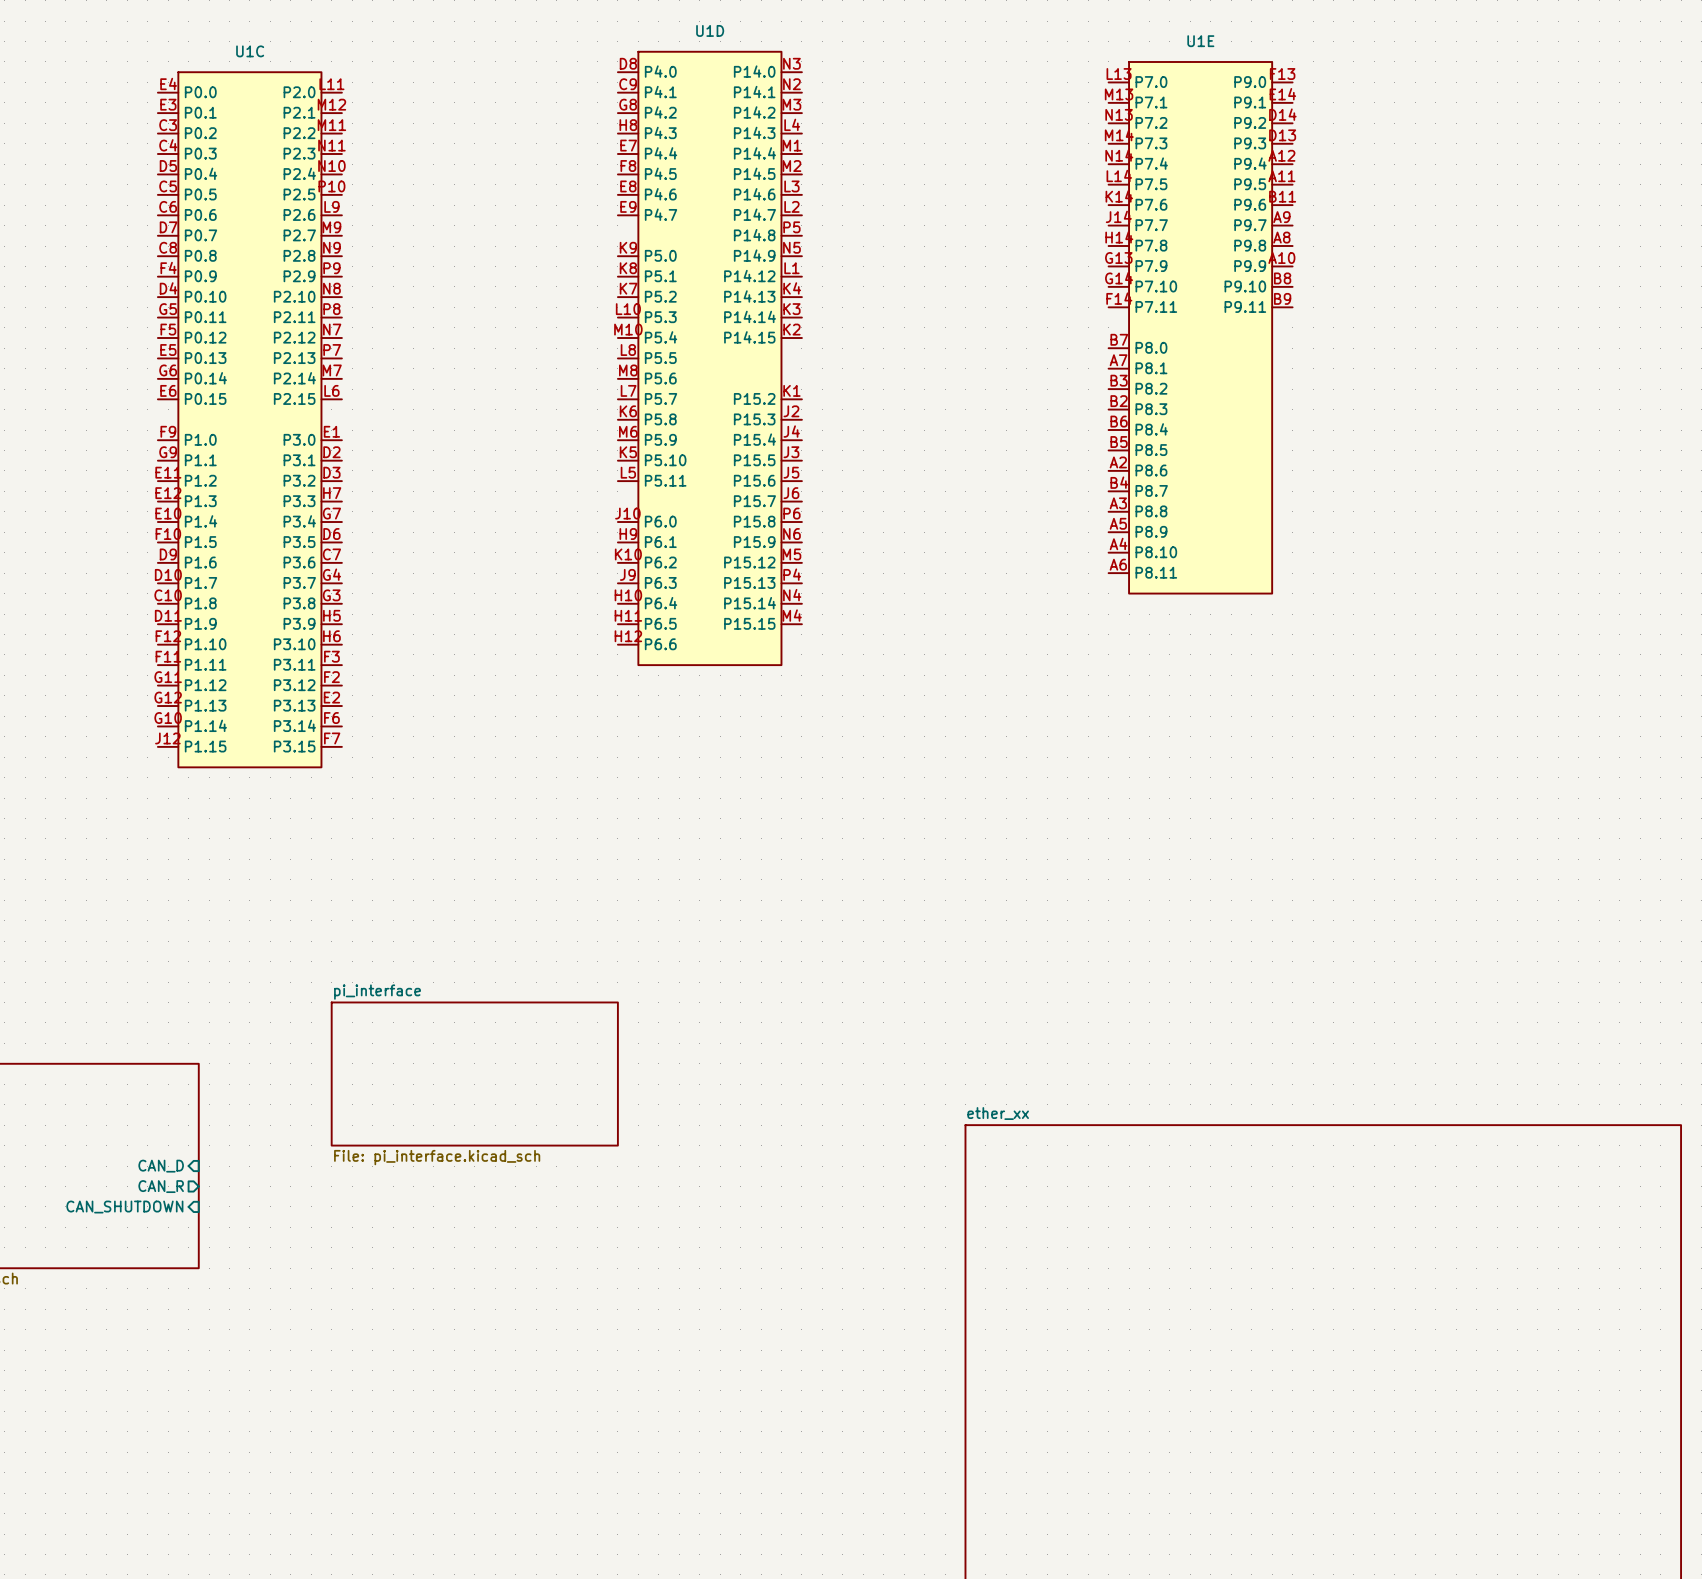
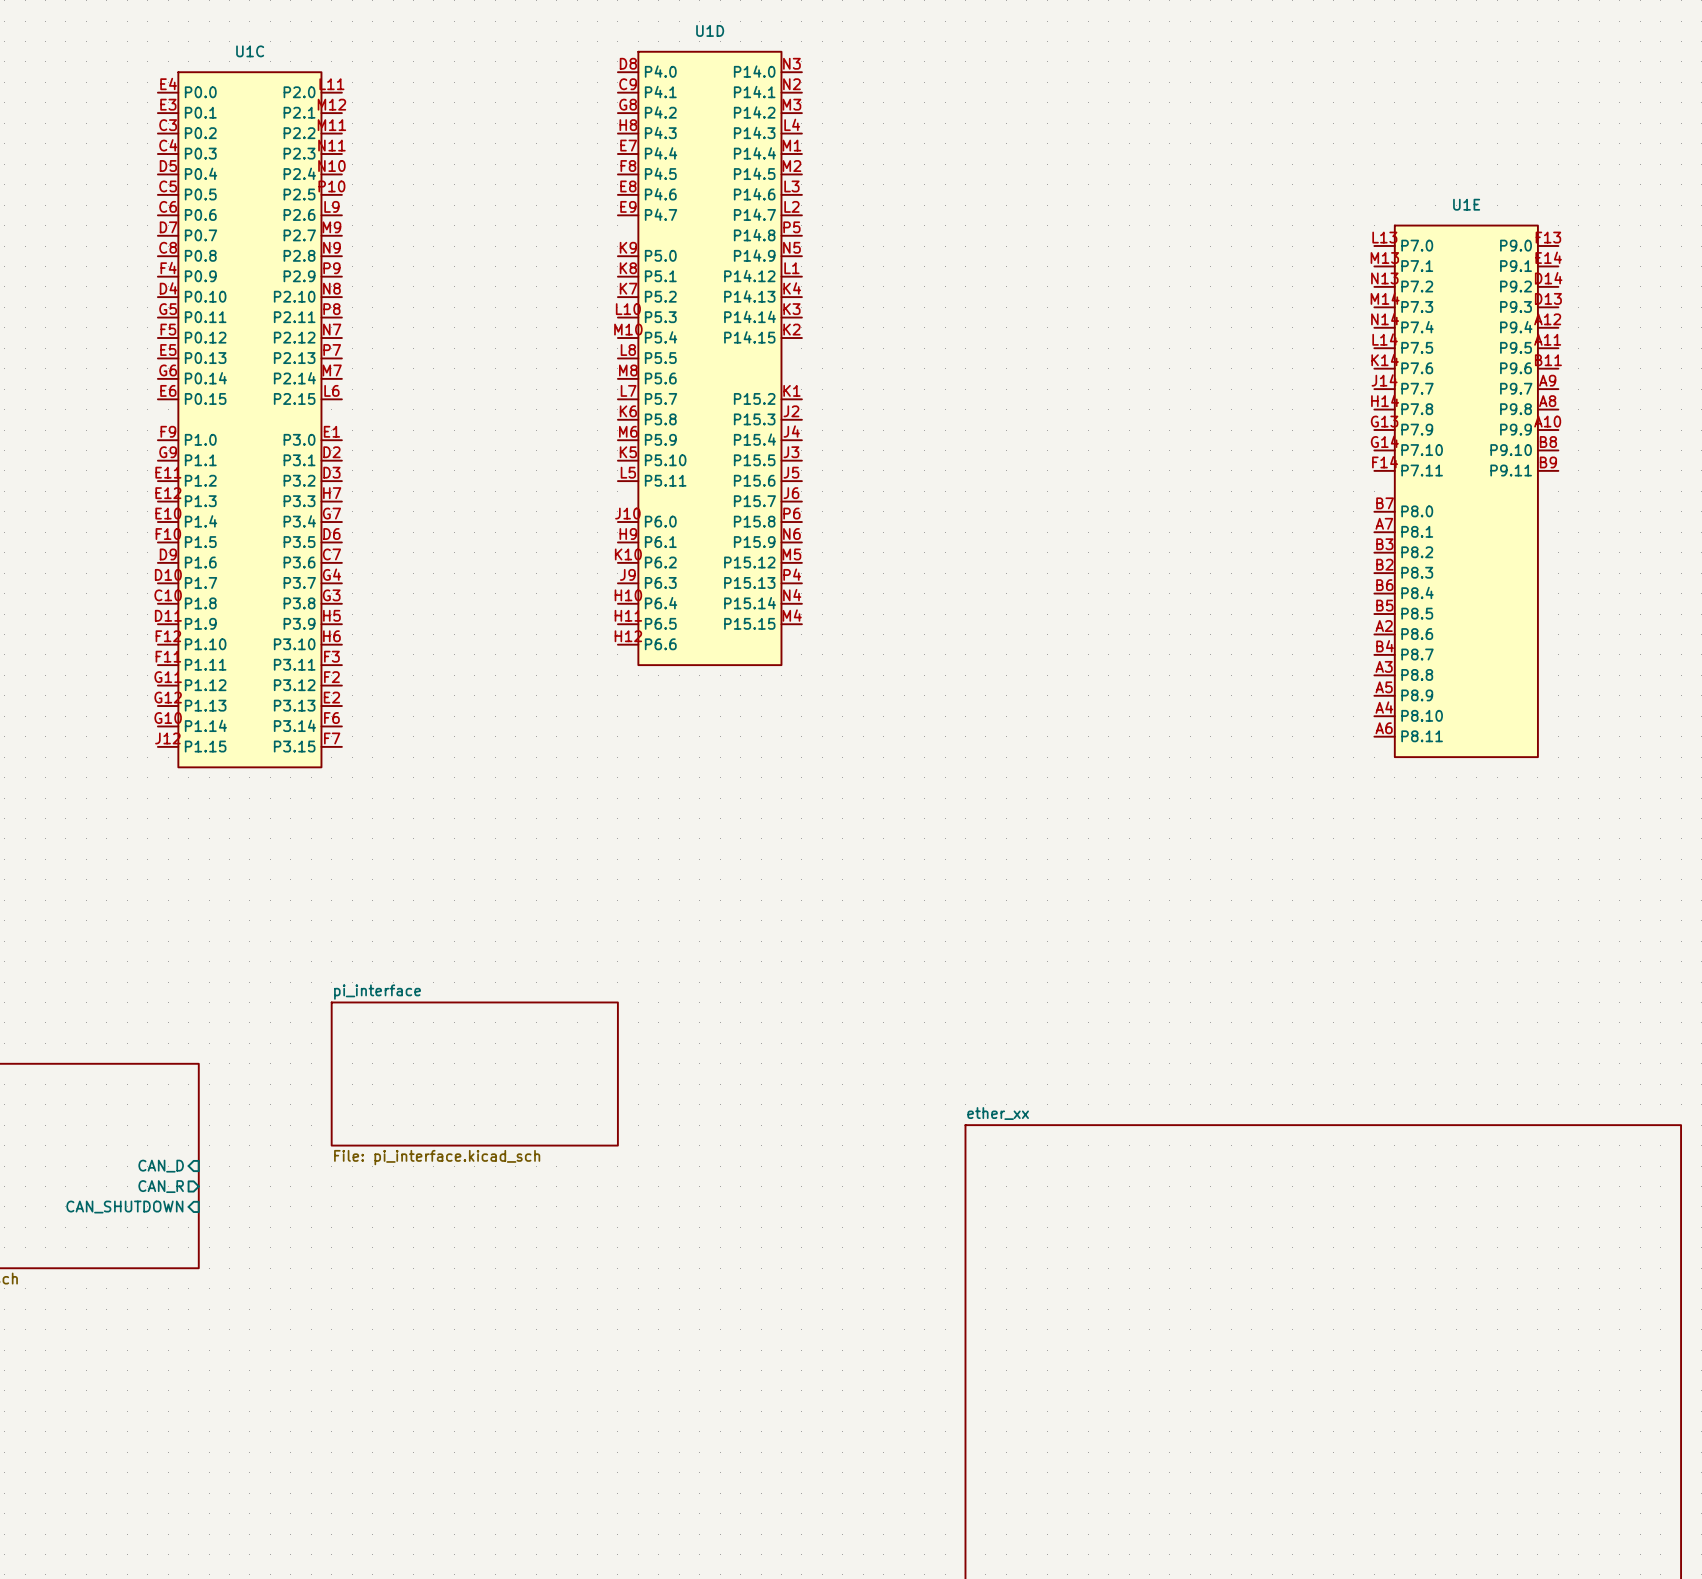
U1E position: (1200, 327) -> (1466, 491)

